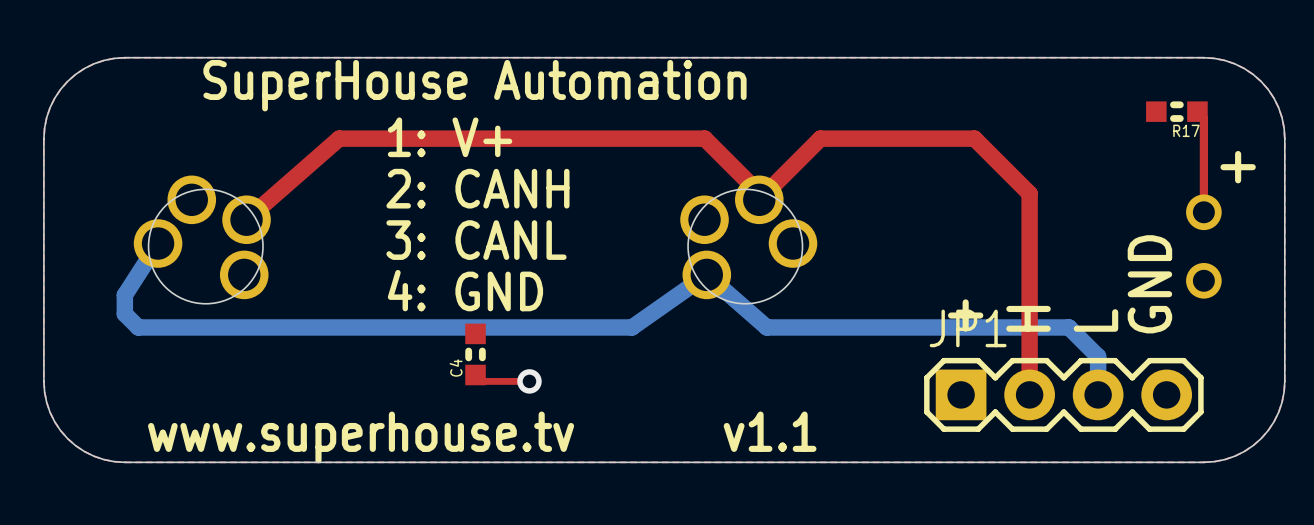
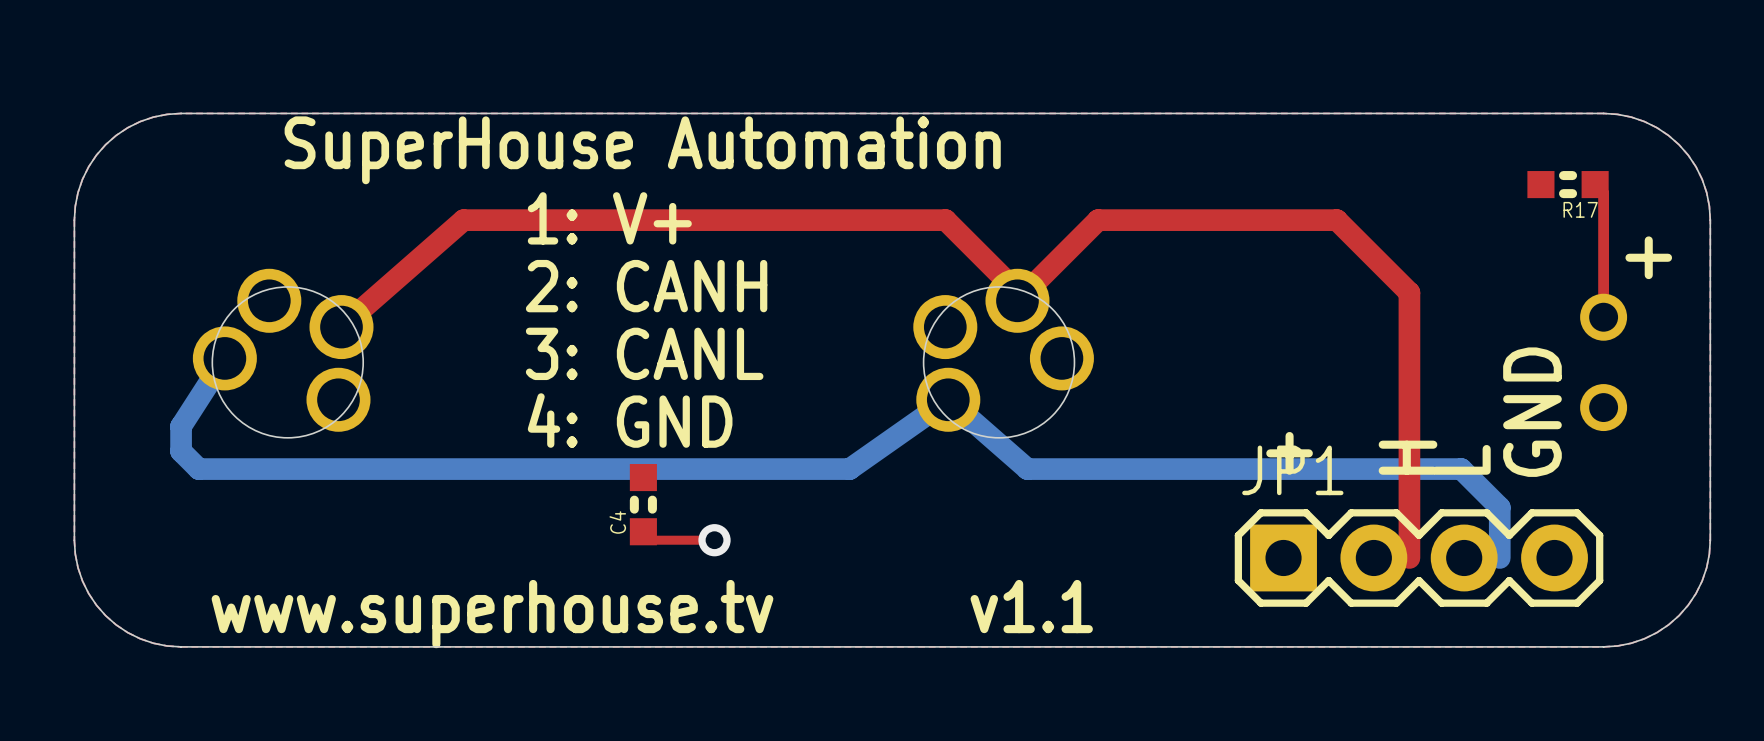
top track: (974, 138) (1029, 193) (1029, 394) -> (1301, 220) (1336, 220) (1409, 292) (1409, 557)
text position: H (1028, 318) -> H (1408, 457)
bottom track: (1069, 327) (1098, 356) (1098, 394) -> (1425, 469) (1461, 469) (1499, 507) (1499, 557)

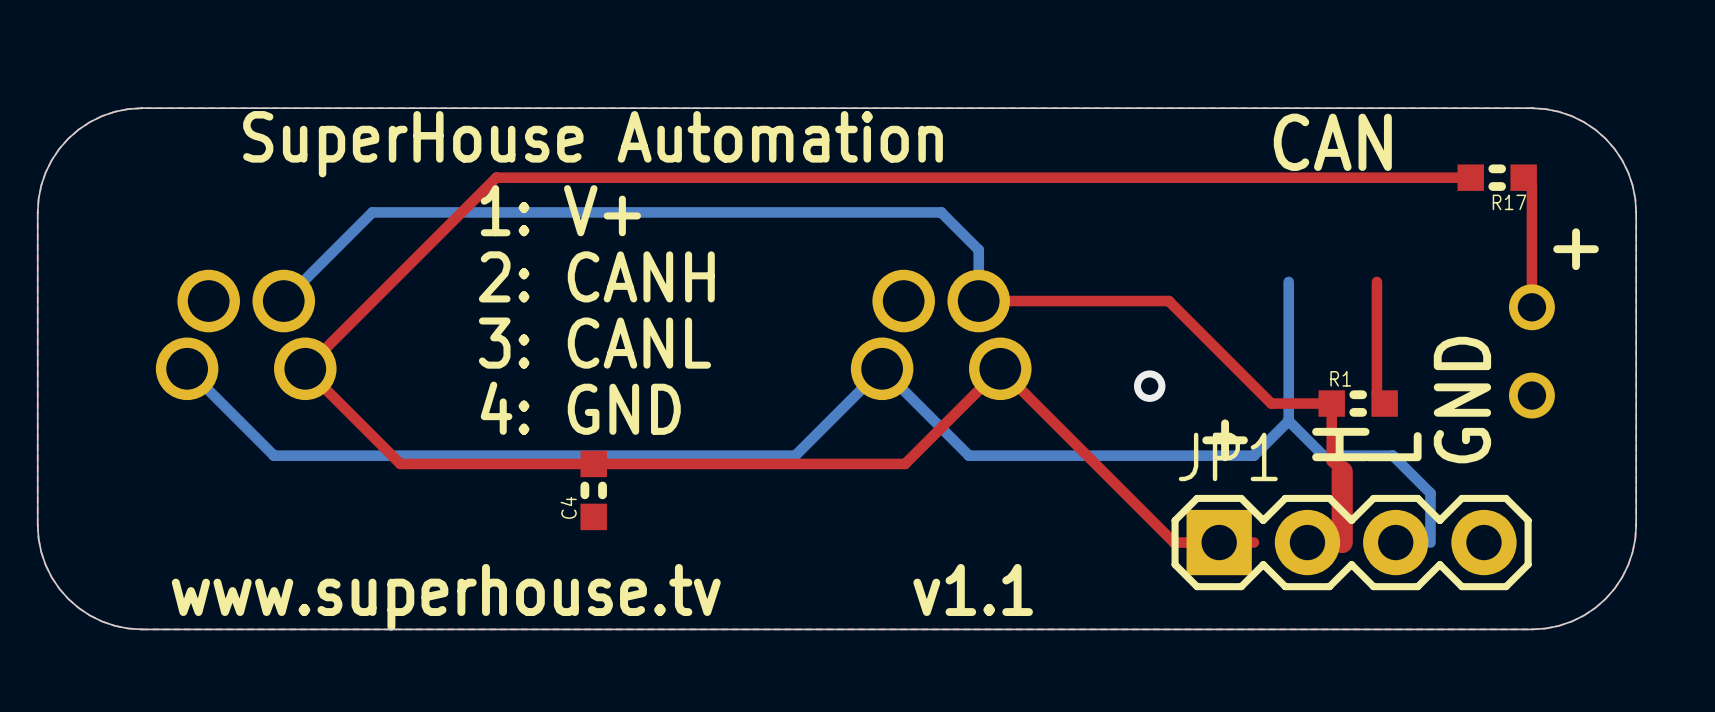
text: none -> CAN (1332, 142)
top track: none -> (1470, 177) (496, 177) (305, 368) (400, 463) (905, 463) (1000, 368) (1174, 542) (1253, 542)
round board edge: [212, 286, 364, 438] -> none
round board edge: [923, 286, 1075, 438] -> none
bottom track: none -> (1288, 281) (1288, 420)
top track: none -> (1376, 281) (1376, 395) (1384, 403)
bottom track: none -> (283, 301) (372, 212) (941, 212) (978, 249) (978, 301)
top track: (341, 327) (463, 220) (945, 220) (1017, 291) (1017, 300) (1098, 220) (1336, 220) (1409, 292) (1409, 485) -> (978, 301) (1168, 301) (1271, 403) (1331, 403) (1331, 461) (1342, 471)
part rotation: 0° (283, 350) -> 20° counterclockwise (246, 334)
part rotation: 0° (1003, 350) -> 20° clockwise (941, 334)
bottom track: (224, 358) (181, 426) (181, 451) (198, 469) (316, 469) -> (187, 368) (274, 455)
via: none -> (1149, 386)
R1: none -> (1358, 403)
bottom track: none -> (1288, 420) (1323, 455)
bottom track width: thick (316, 469) (849, 469) -> thin (274, 455) (795, 455)
bottom track: (849, 469) (948, 399) (1027, 469) -> (795, 455) (882, 368) (969, 455)
bottom track width: thick (1027, 469) (1319, 469) -> thin (969, 455) (1253, 455)
bottom track: (1319, 469) (1390, 469) -> (1253, 455) (1288, 420)
bottom track width: thick (1390, 469) (1461, 469) (1499, 507) (1499, 557) -> thin (1323, 455) (1392, 455) (1430, 493) (1430, 542)
top track: (643, 531) (651, 540) (714, 540) -> none
via: (714, 540) -> none

